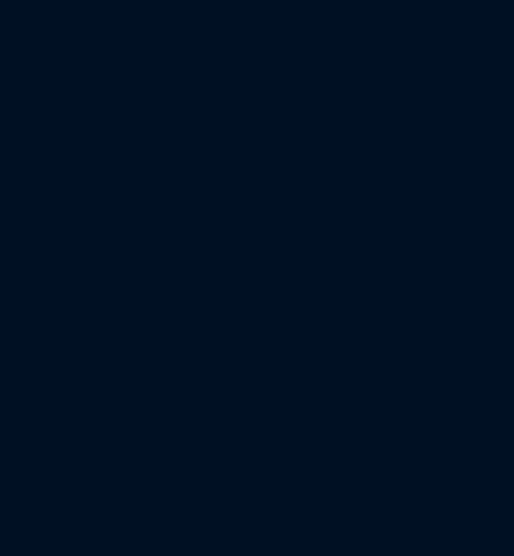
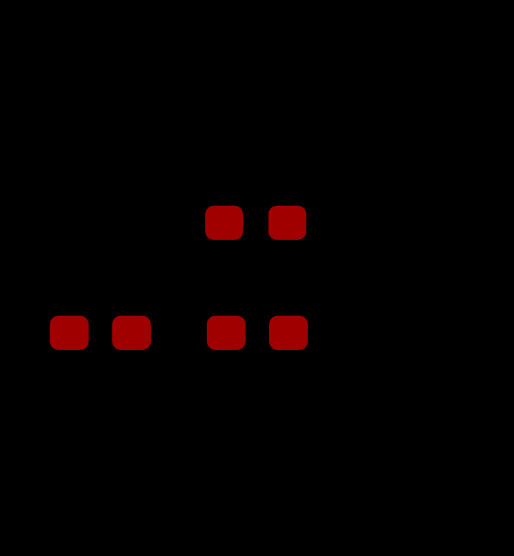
part: none -> (255, 222)
part: none -> (100, 332)
part: none -> (257, 332)

